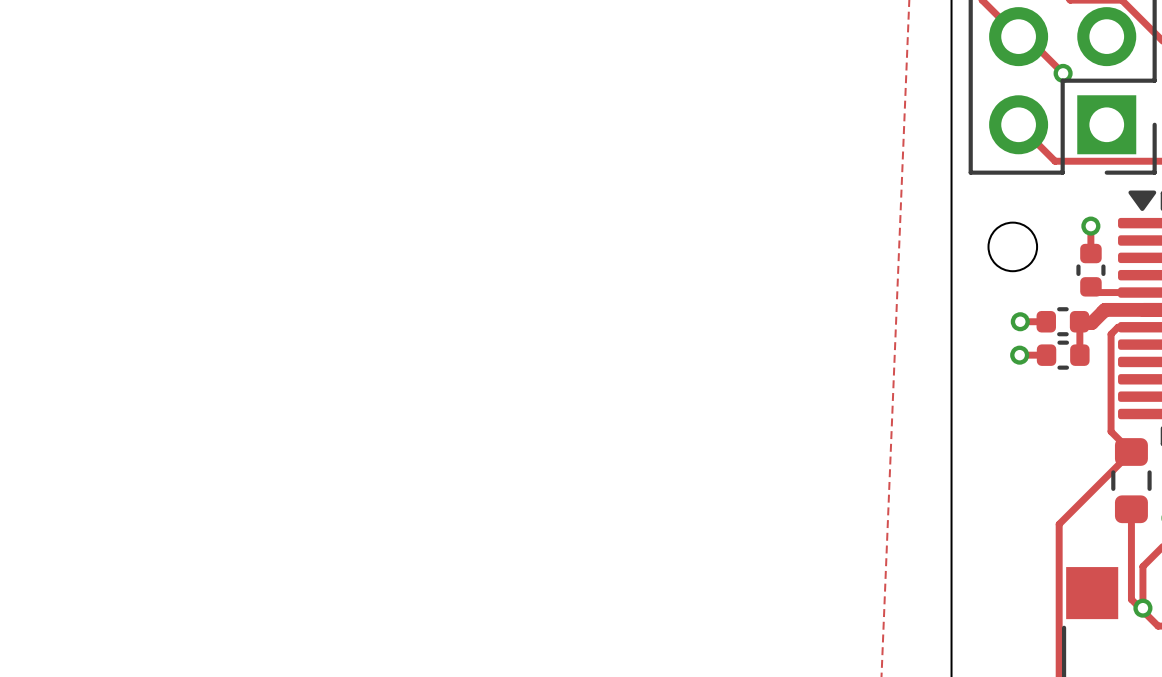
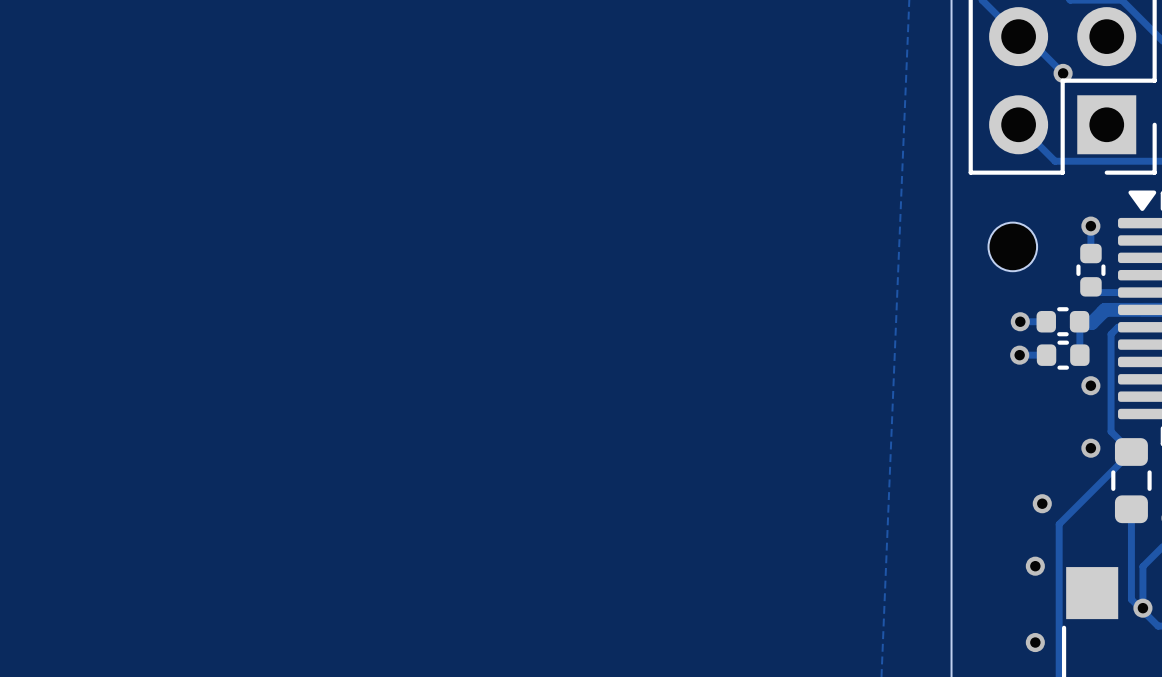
via: none -> (1090, 385)
via: none -> (1090, 448)
via: none -> (1042, 503)
via: none -> (1035, 566)
via: none -> (1035, 642)

